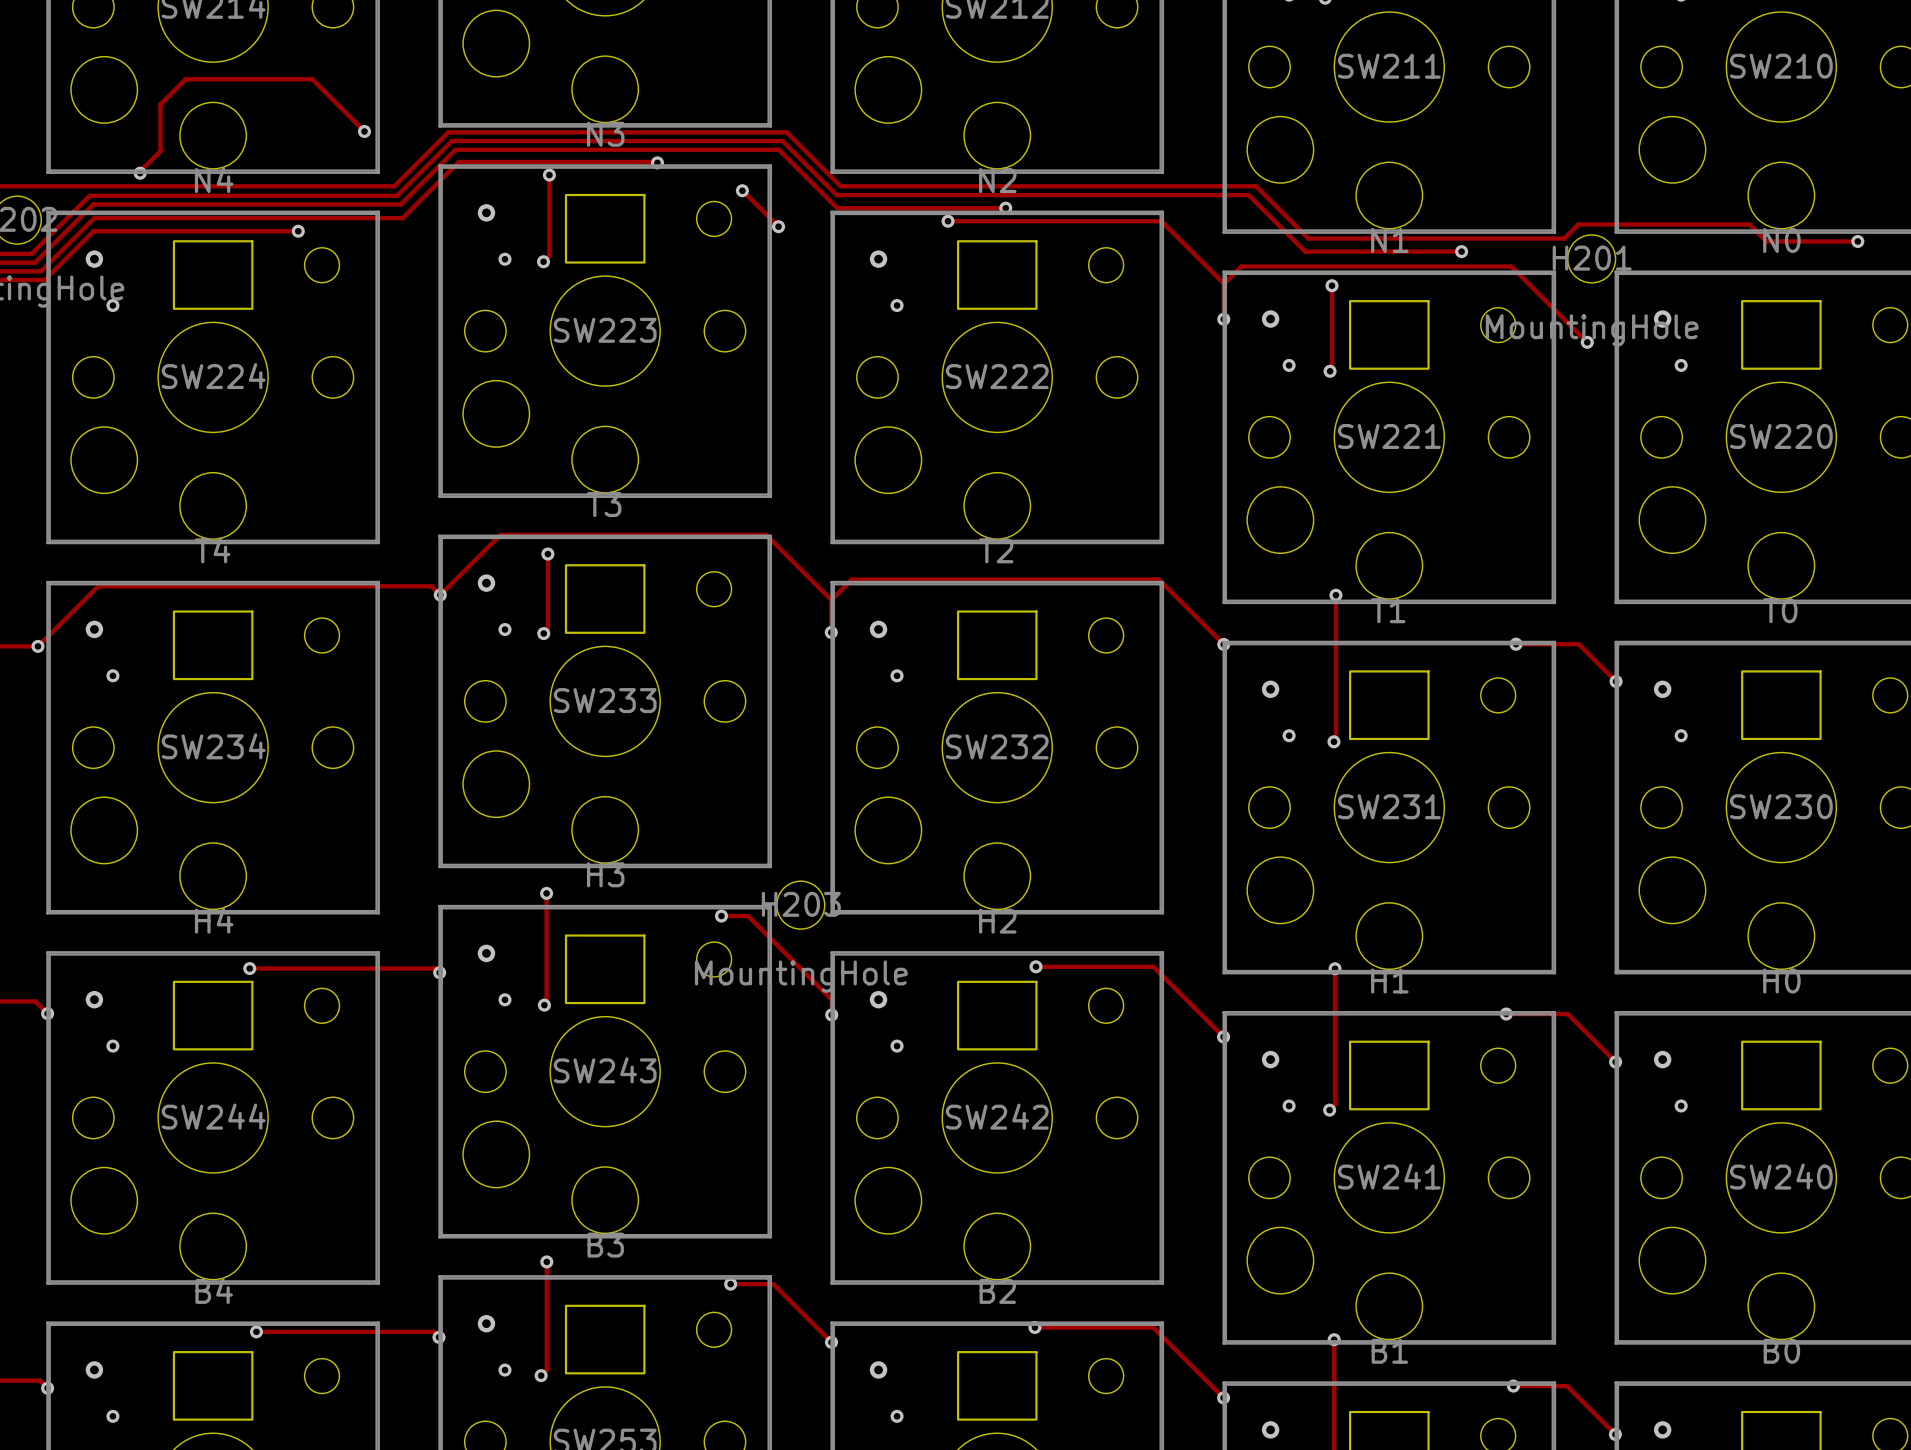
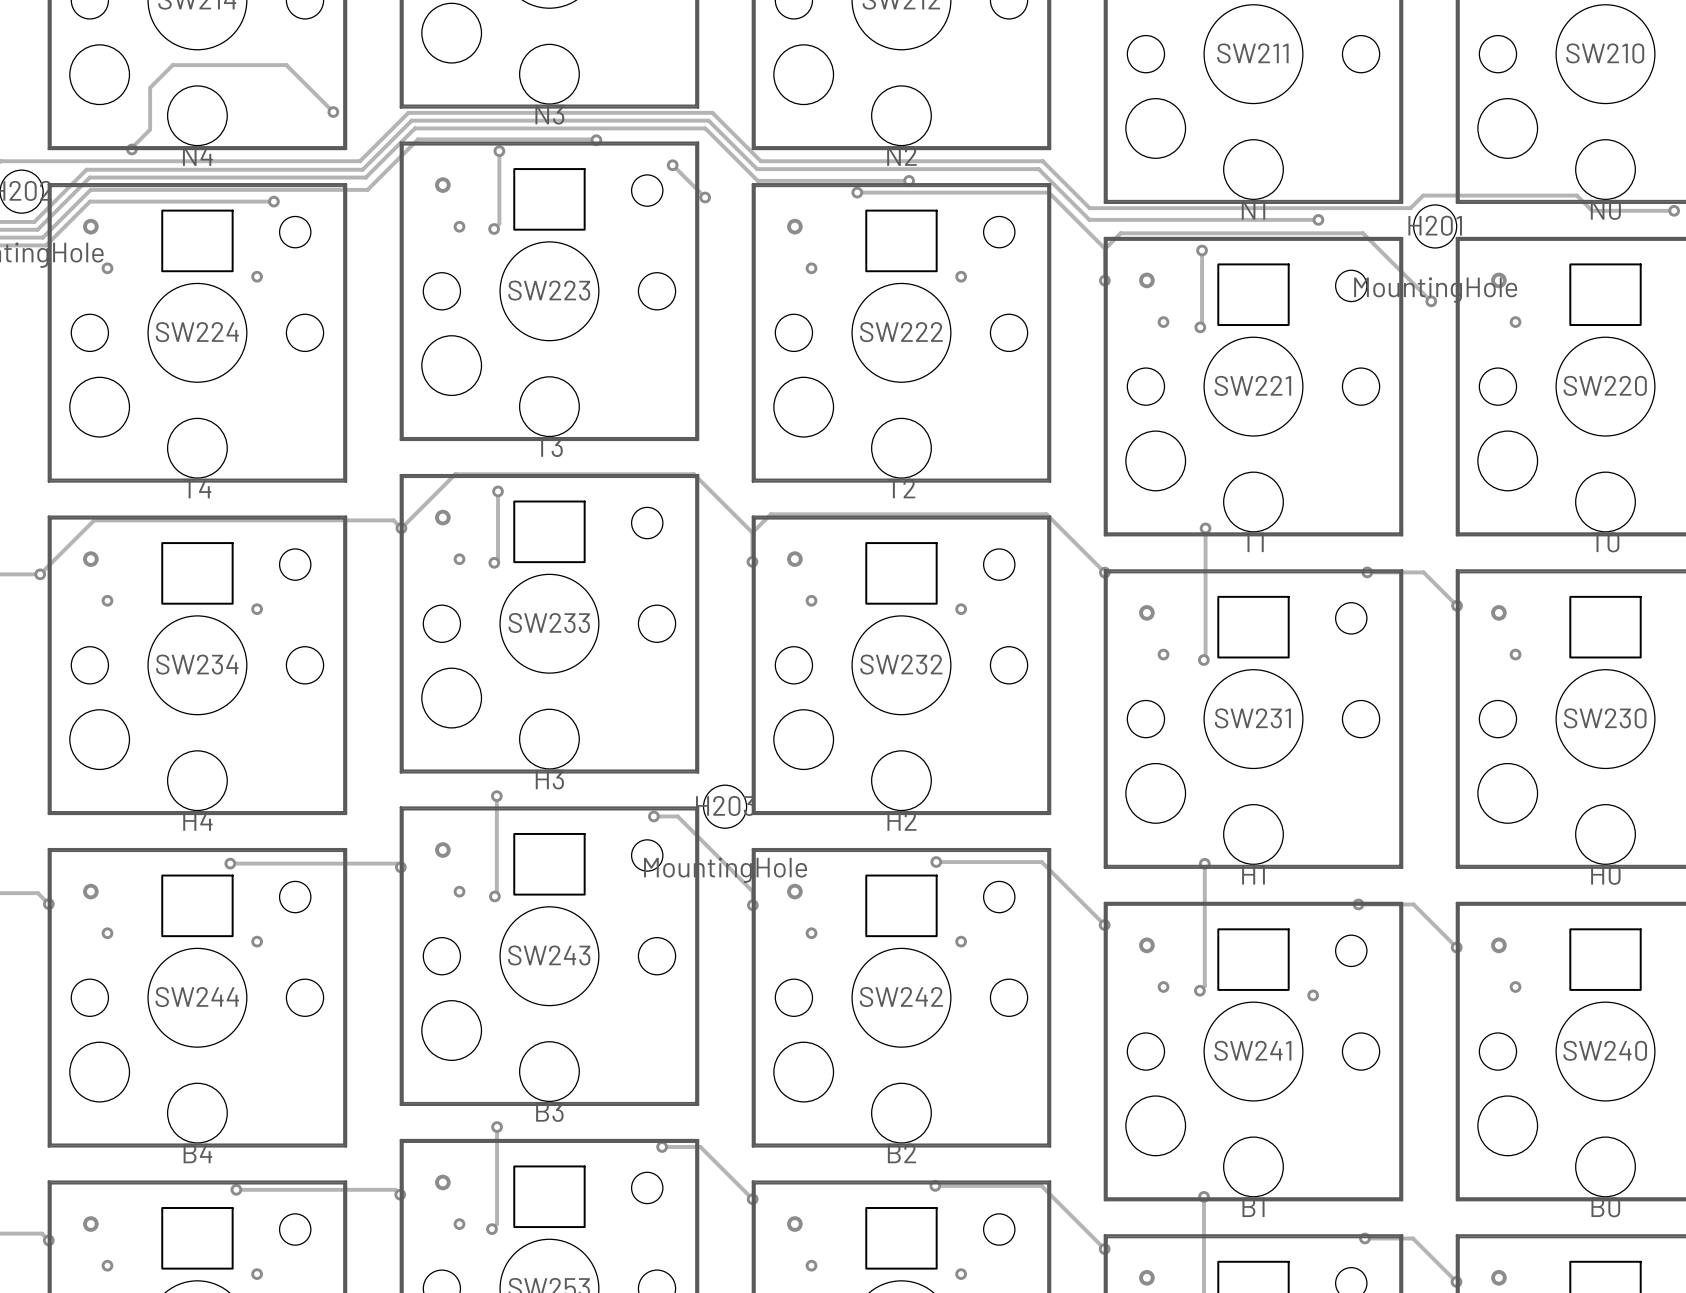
track: (1154, 186) (1256, 186) (1308, 238) -> (1042, 161) (1089, 208) (1180, 208)
track: (1150, 195) (1248, 195) (1305, 251) -> (1038, 169) (1089, 219) (1177, 219)
via: none -> (257, 276)
via: none -> (961, 276)
via: none -> (257, 609)
via: none -> (961, 609)
via: none -> (257, 941)
via: none -> (961, 941)
via: none -> (1313, 995)
via: none -> (257, 1274)
via: none -> (961, 1274)

